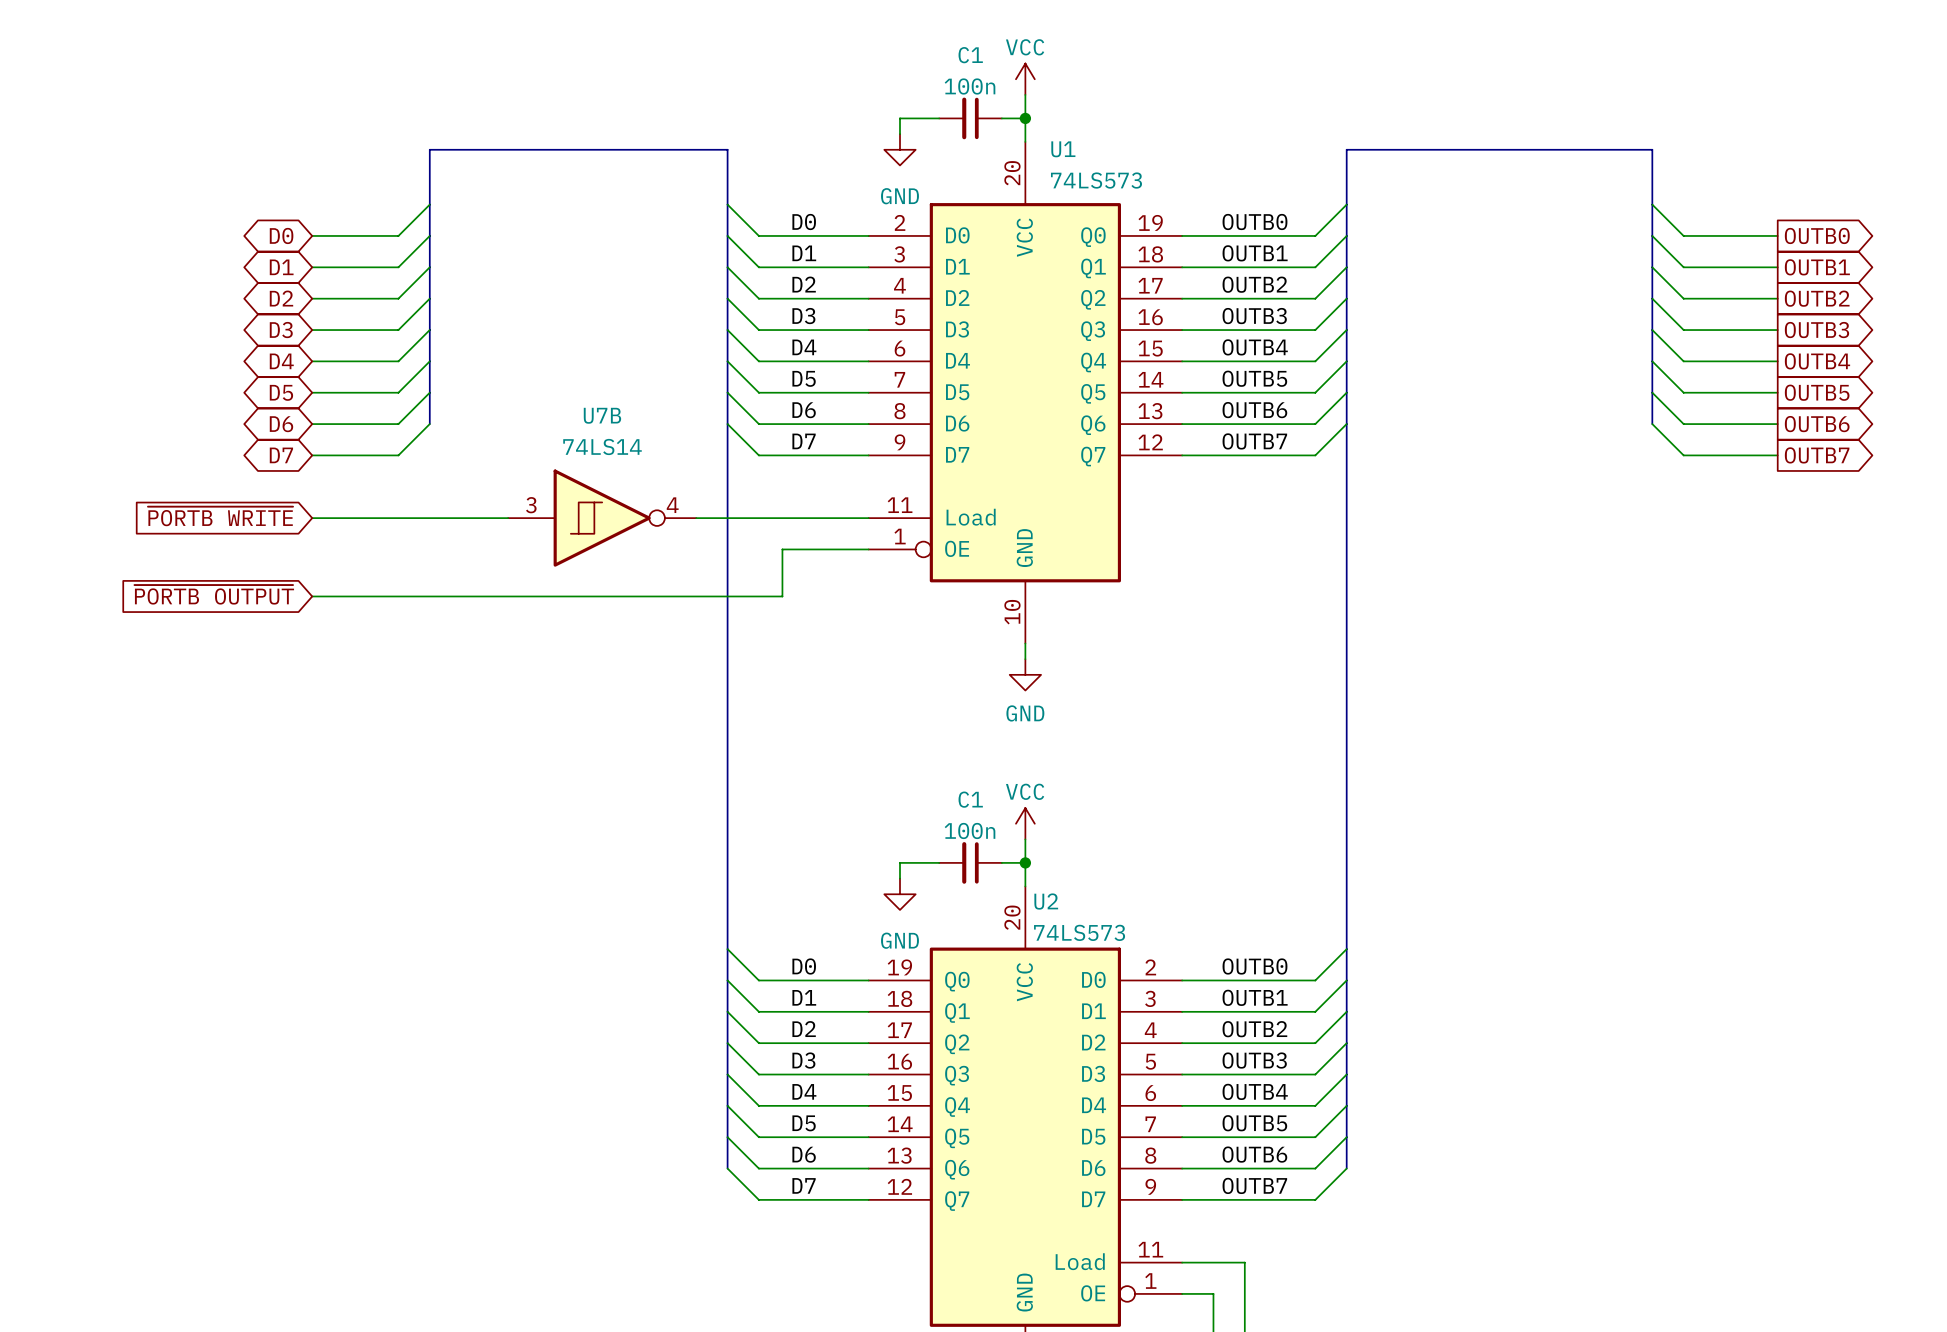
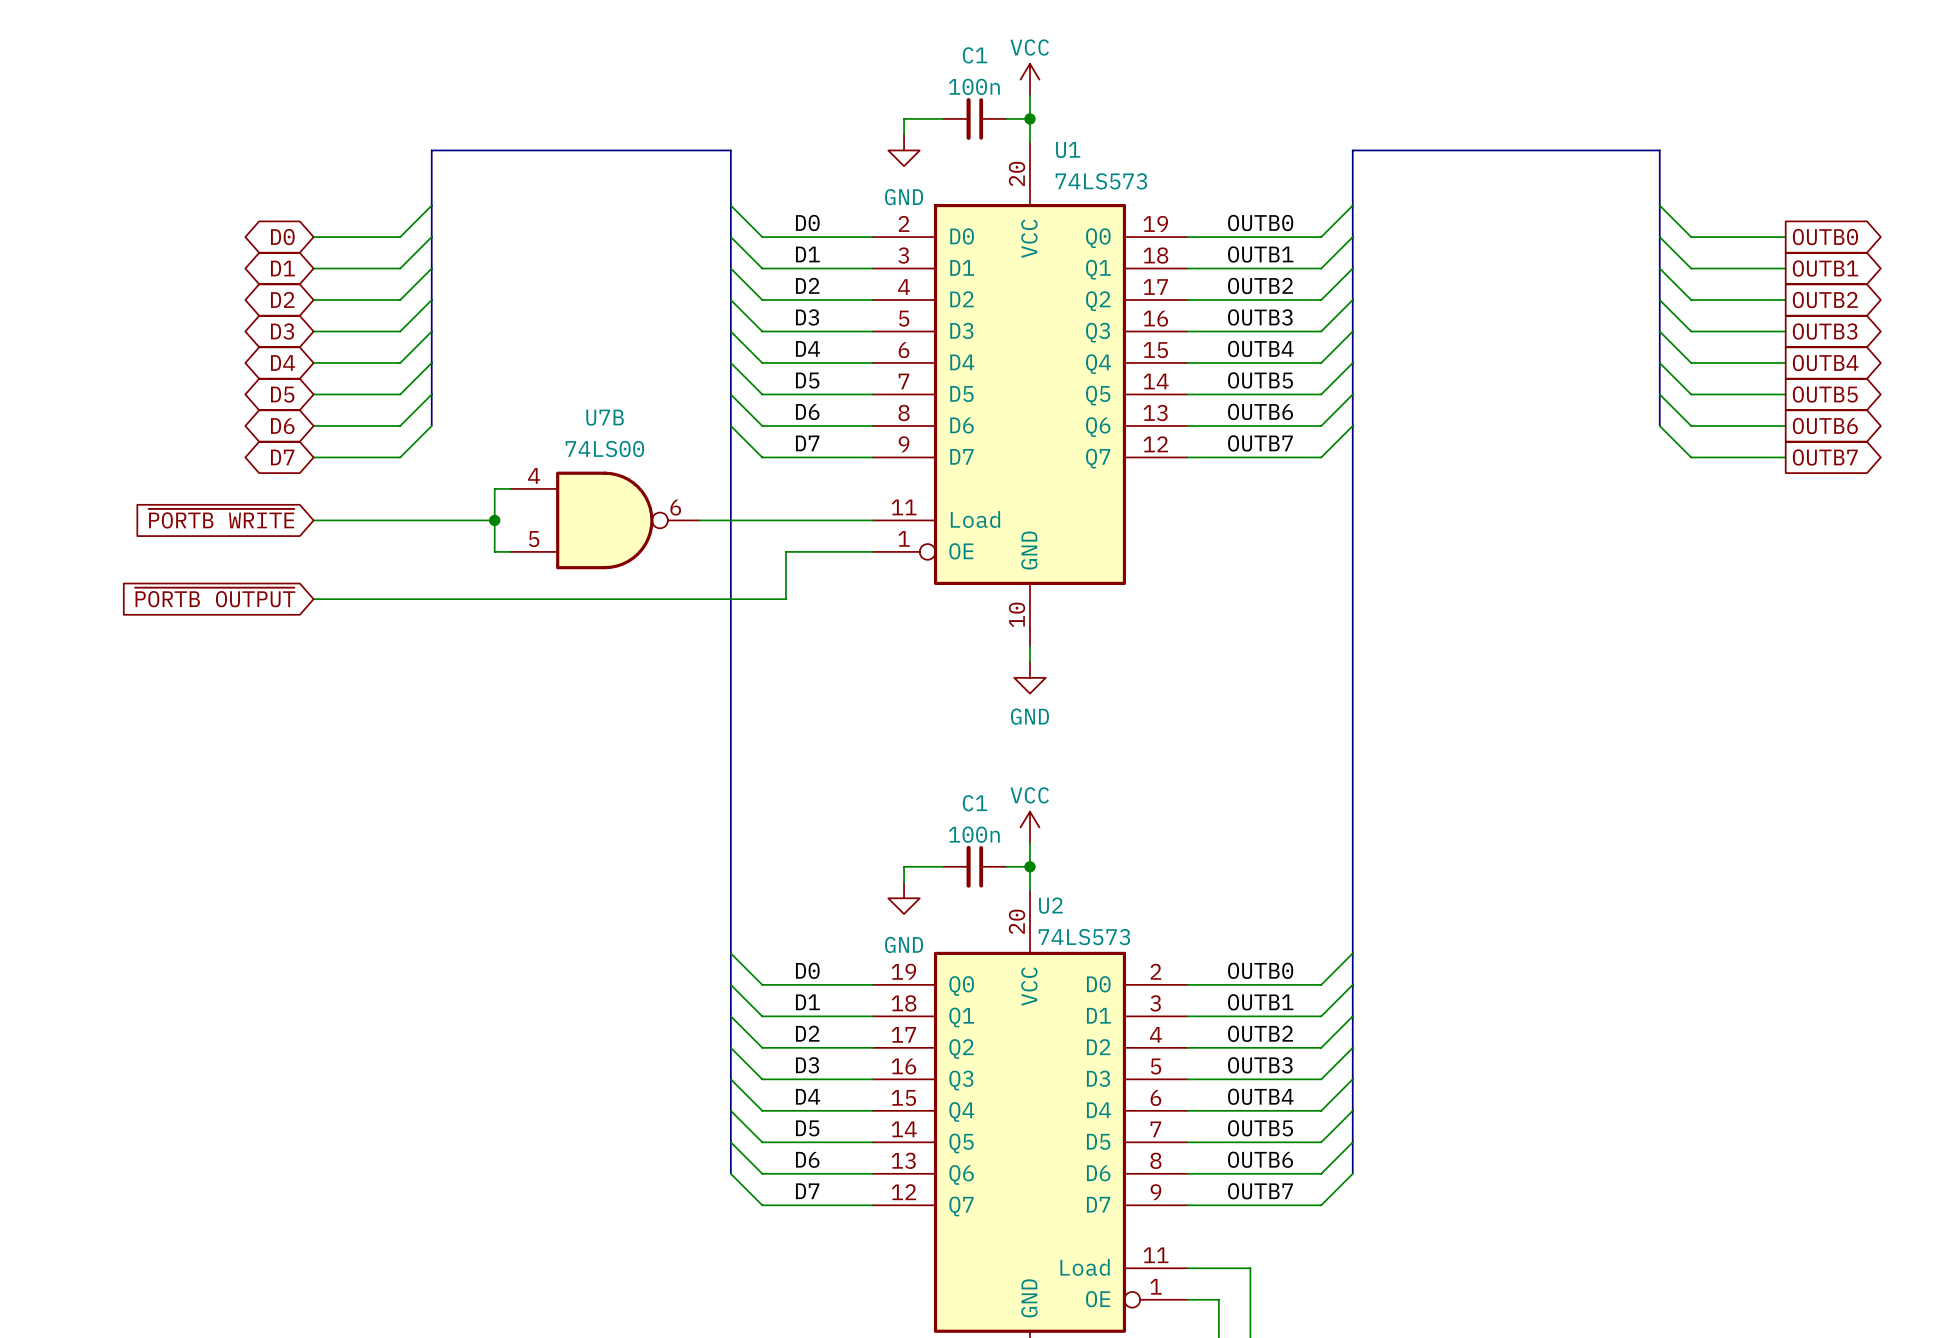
U7B value: 74LS14 (602, 446) -> 74LS00 (604, 449)
U7B symbol: [508, 469, 697, 567] -> [510, 471, 700, 570]
wire: none -> (510, 488) (494, 488) (494, 551) (510, 551)
wire: (492, 518) (508, 518) -> none
junction: none -> (494, 520)

